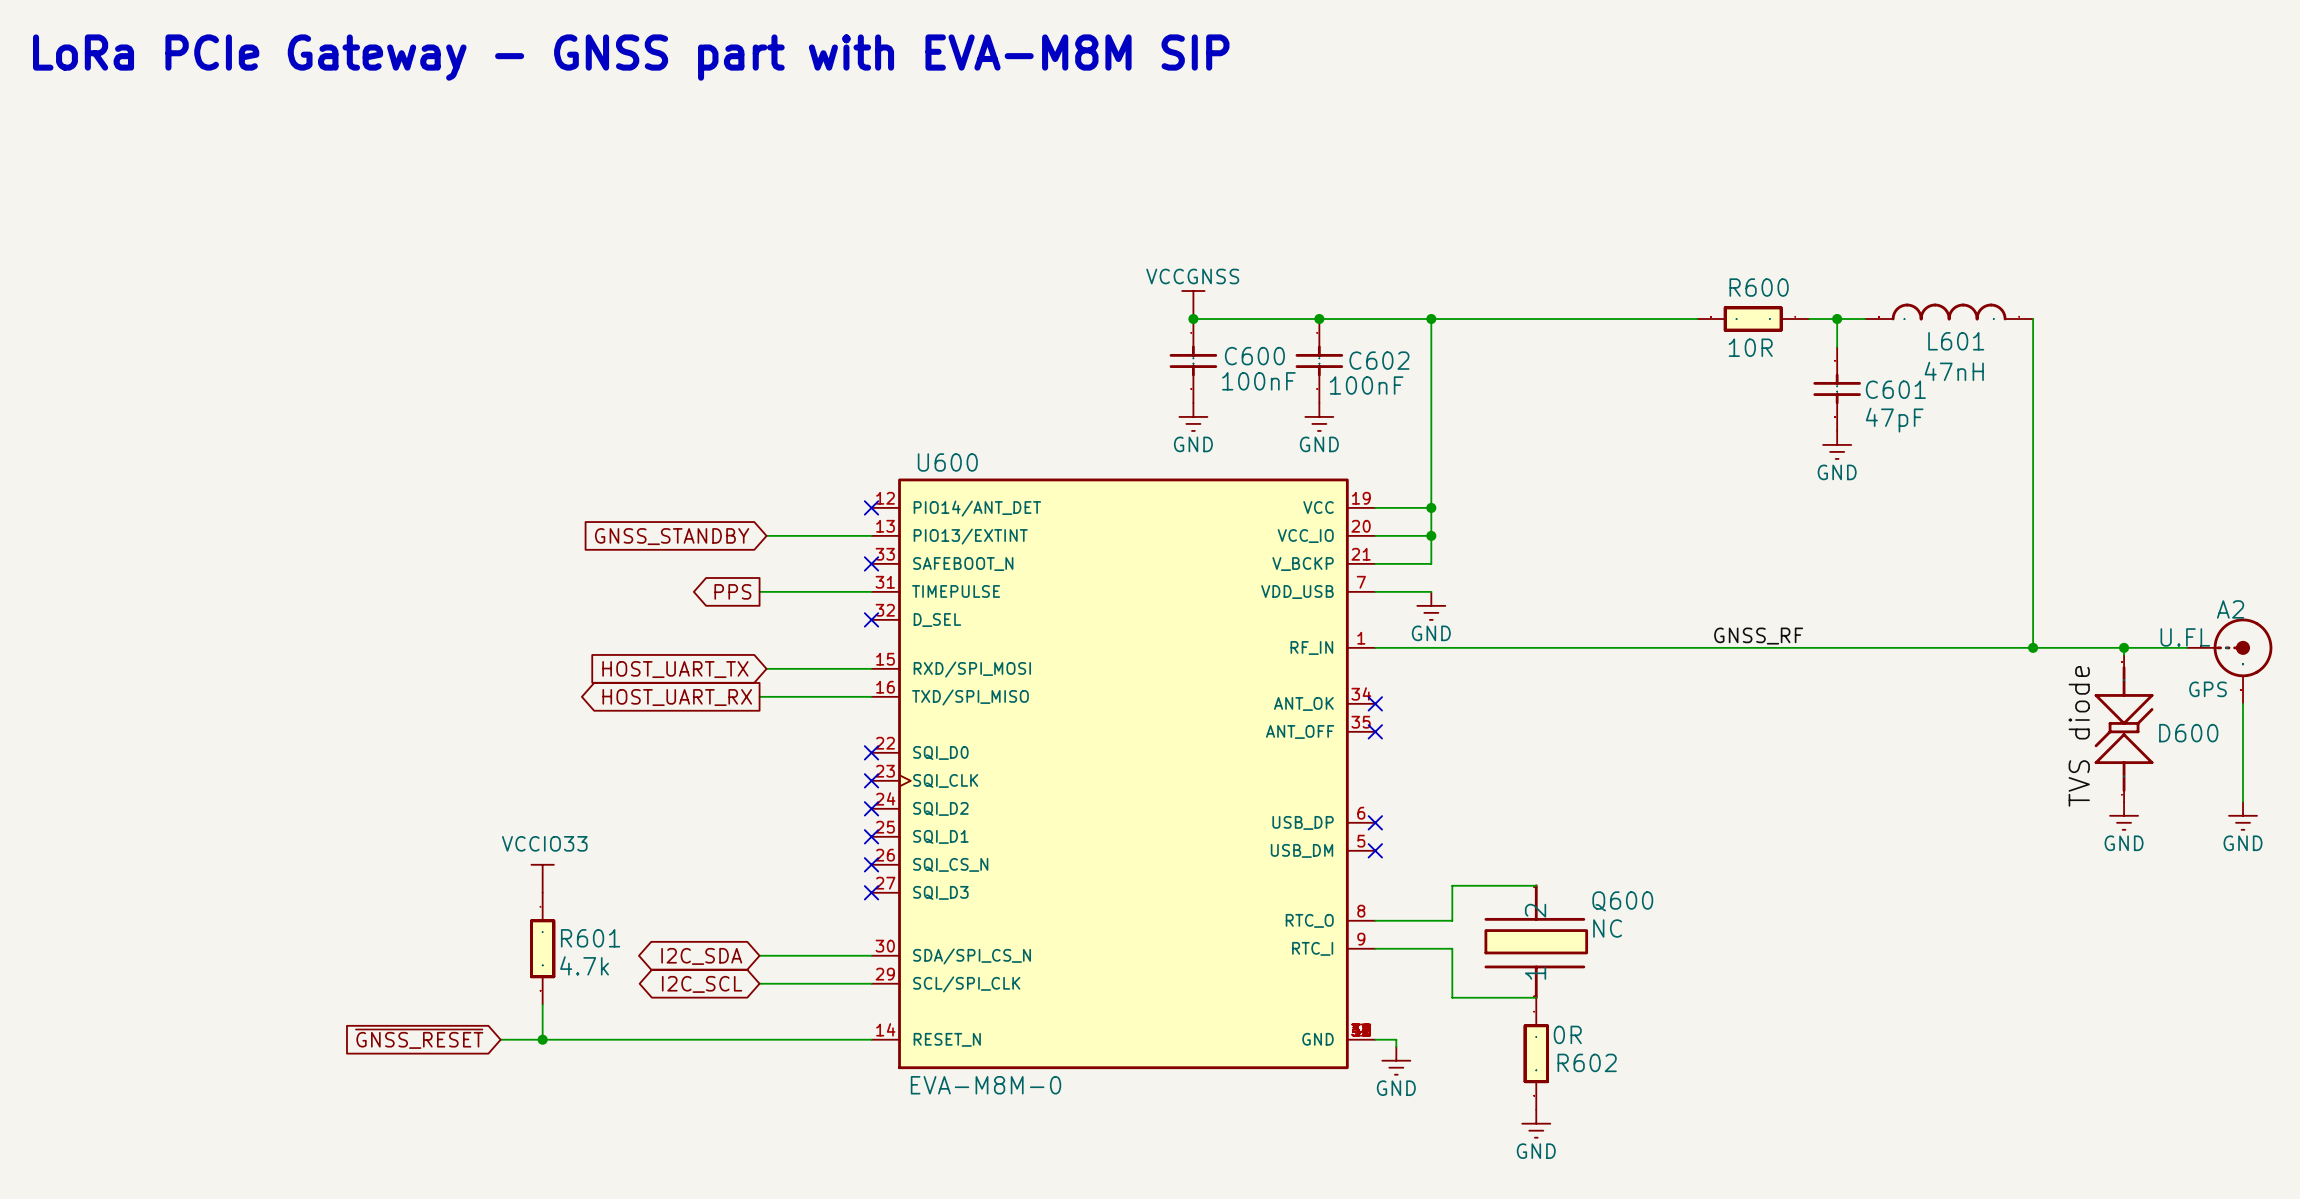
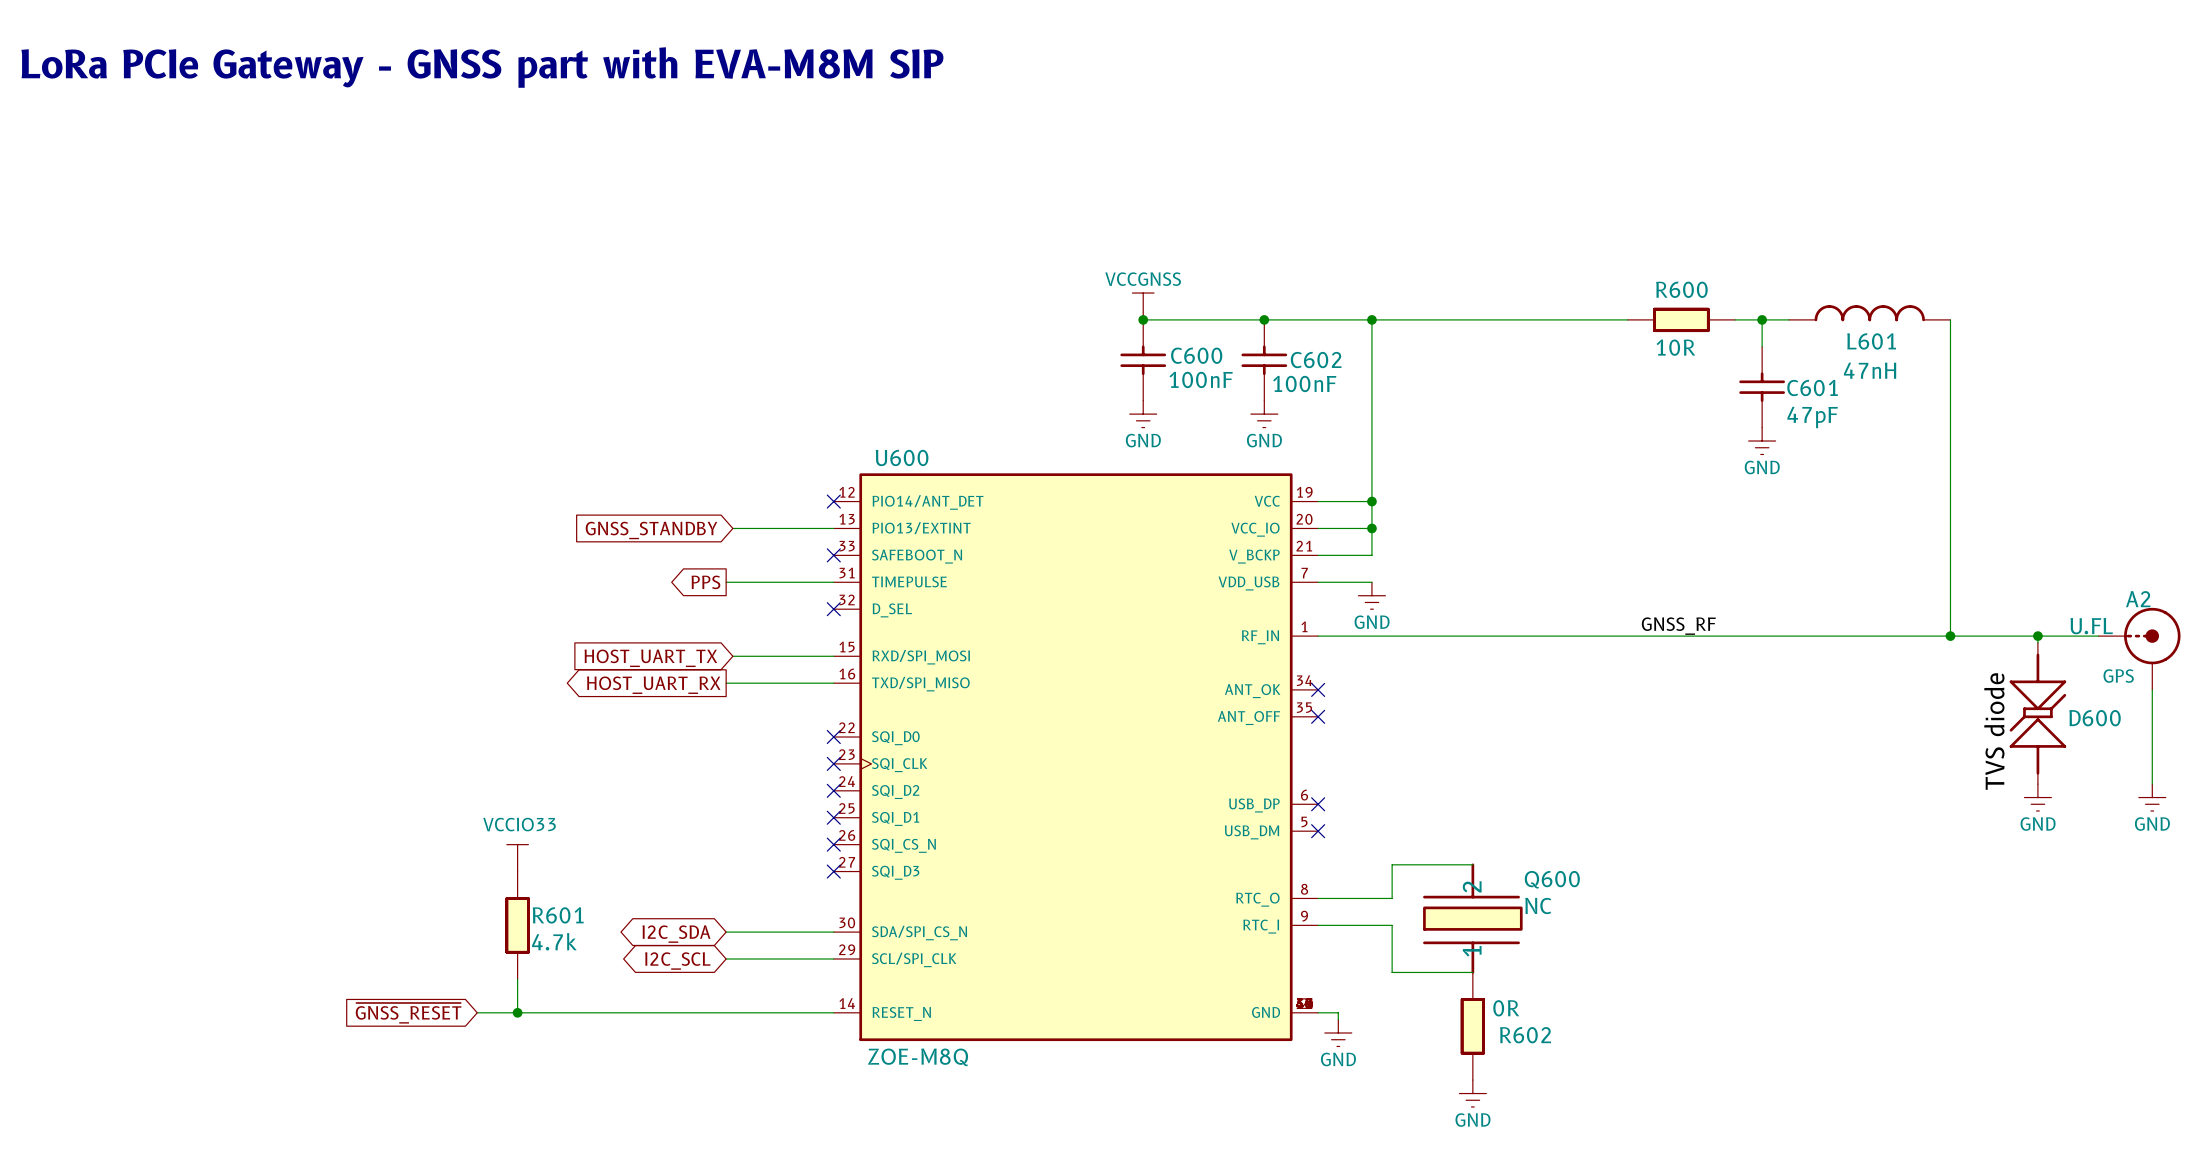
U600 value: EVA-M8M-0 (985, 1085) -> ZOE-M8Q (918, 1057)

